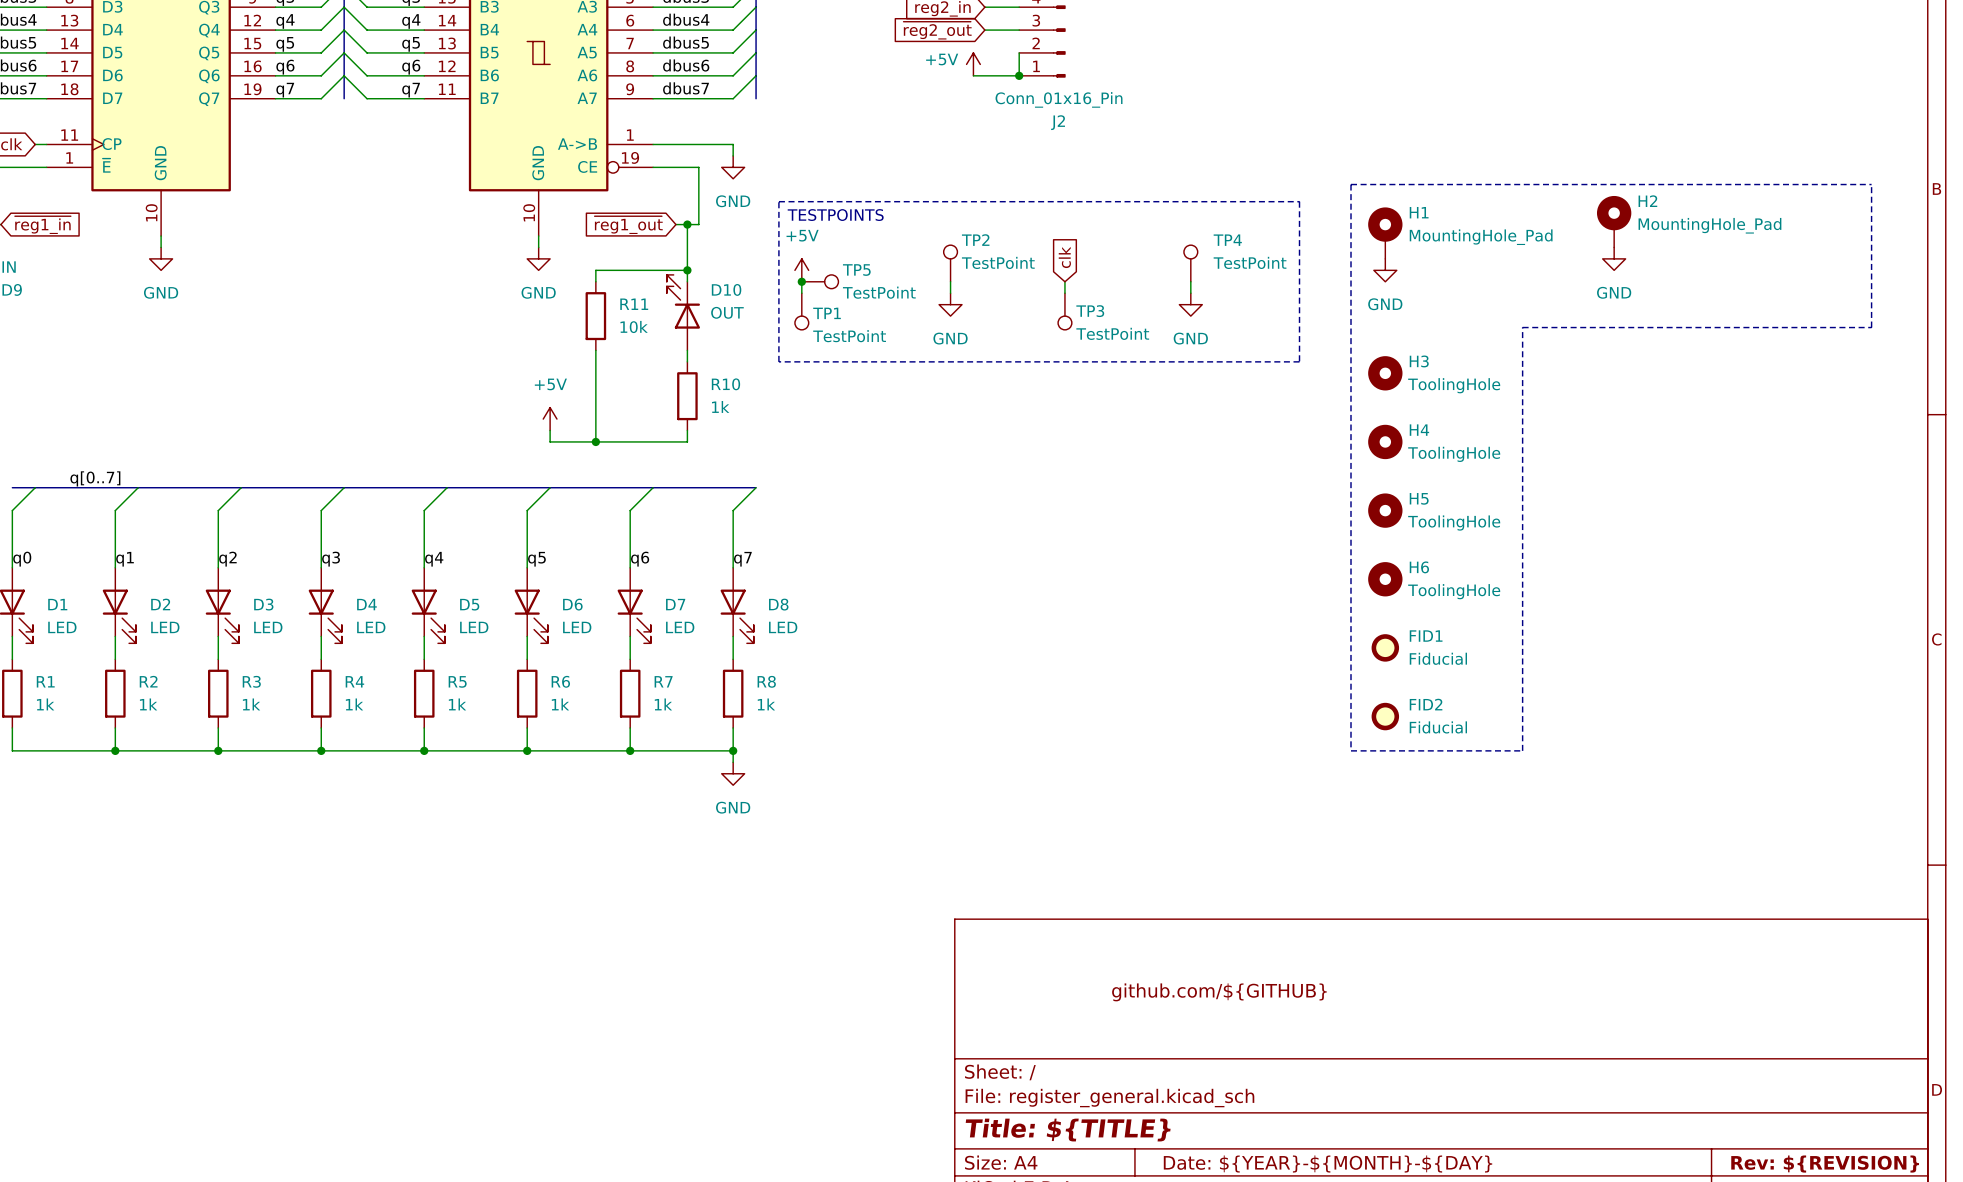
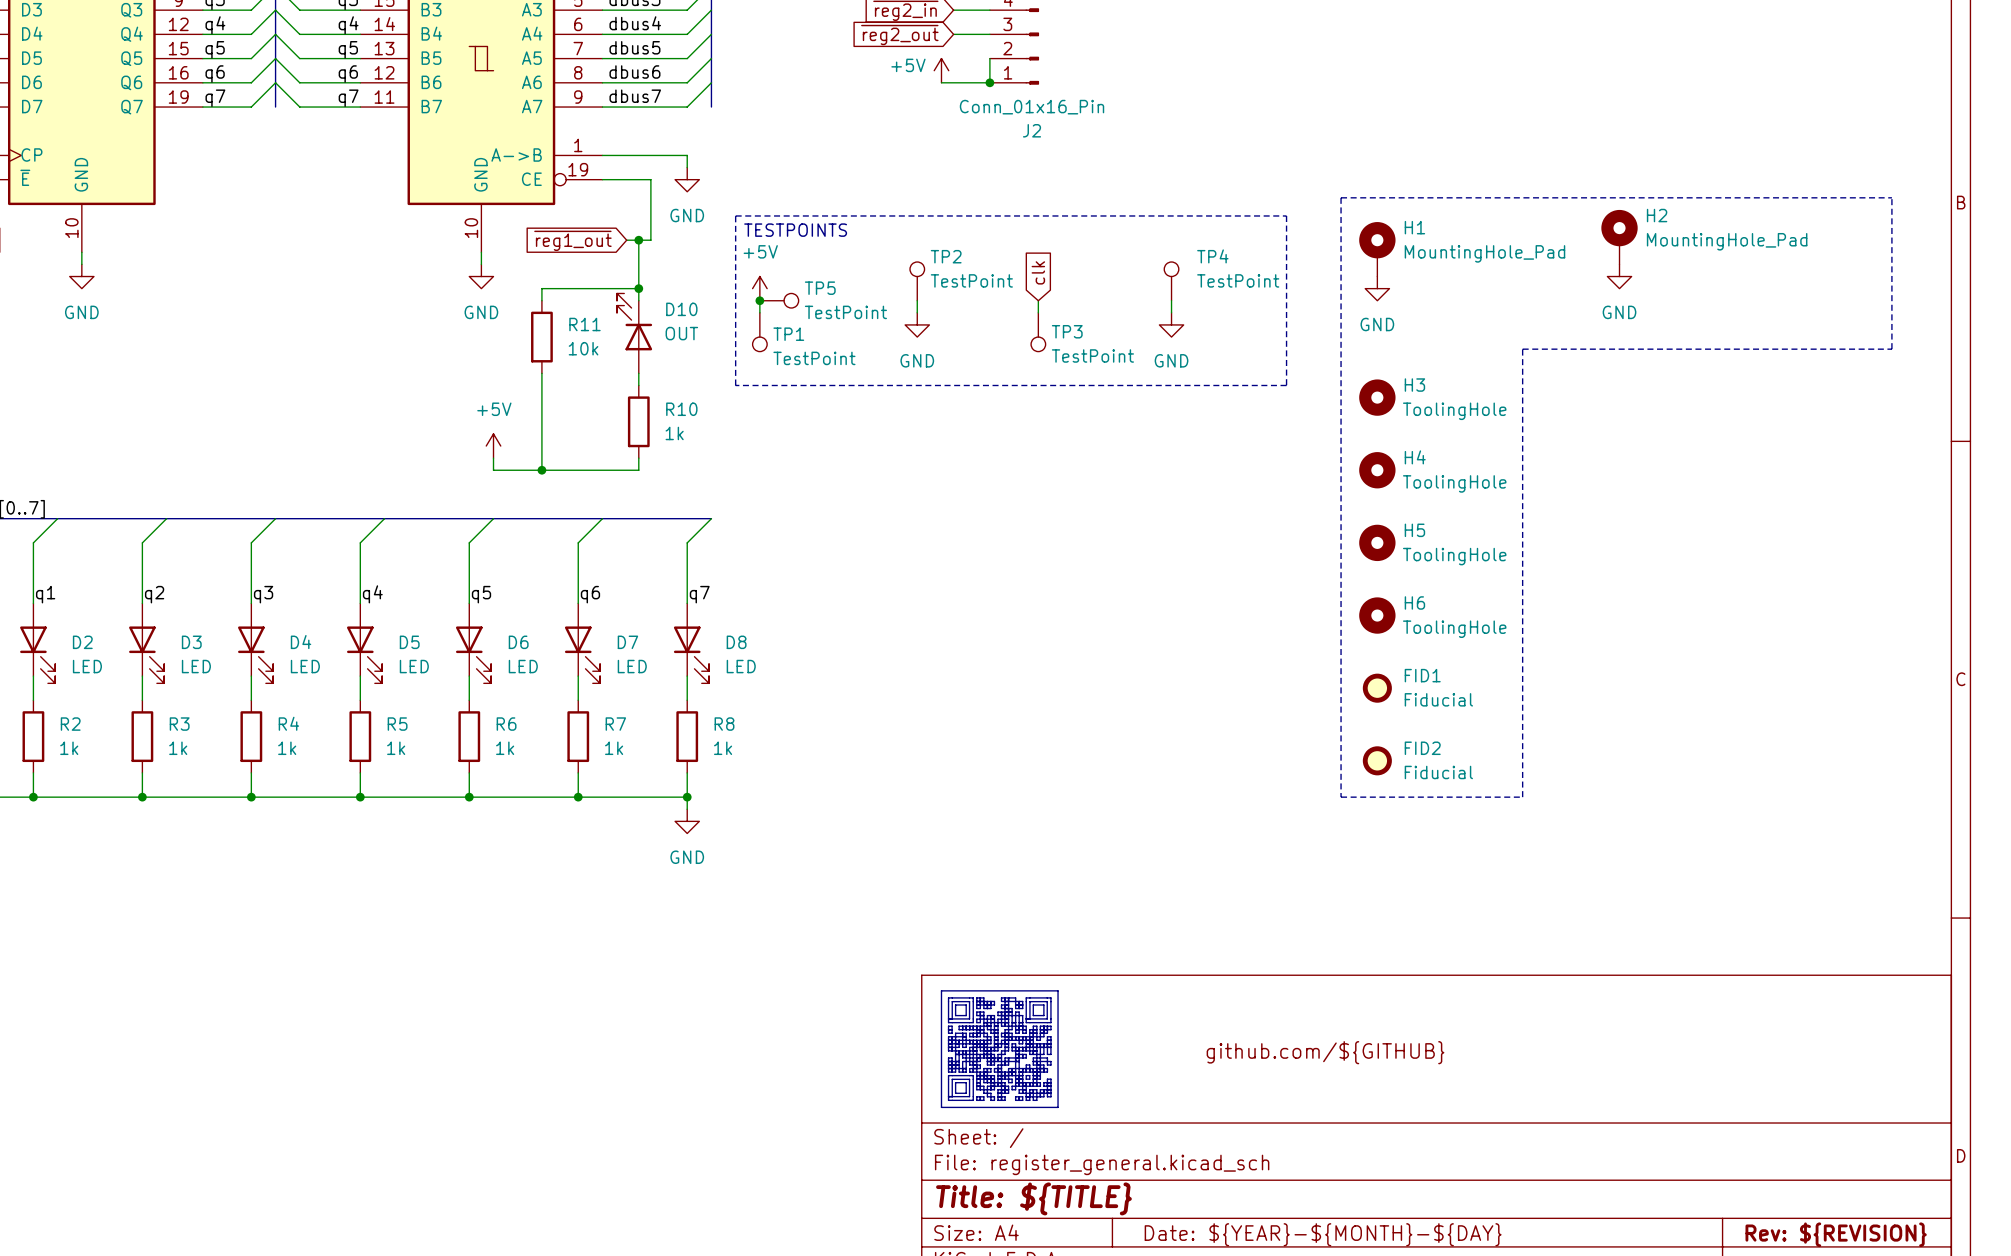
line: none -> (941, 990) (941, 1107) (1058, 1107) (1058, 990) (941, 990)
line: none -> (948, 997) (973, 997) (973, 1022) (948, 1022) (948, 997)
line: none -> (980, 997) (980, 1008) (976, 1008) (976, 997) (983, 997) (983, 1008) (990, 1008) (990, 1001)
line: none -> (1001, 997) (1001, 1001) (1022, 1001) (1022, 1008) (1015, 1008) (1015, 997) (1001, 997)
line: none -> (1005, 997) (1005, 1026)
line: none -> (1008, 997) (1008, 1050) (1001, 1050) (1001, 1100)
line: none -> (1026, 997) (1026, 1022) (1050, 1022) (1050, 997) (1026, 997)
line: none -> (976, 1001) (994, 1001) (994, 1005) (976, 1005)
line: none -> (987, 1001) (987, 1008)
line: none -> (1019, 1001) (1019, 1008)
line: none -> (955, 1005) (955, 1015) (966, 1015) (966, 1005) (955, 1005)
line: none -> (1008, 1005) (1001, 1005) (1001, 1008) (1012, 1008) (1012, 1029) (1005, 1029) (1005, 1054) (997, 1054) (997, 1061)
line: none -> (1015, 1005) (1022, 1005)
line: none -> (1033, 1005) (1033, 1015) (1043, 1015) (1043, 1005) (1033, 1005)
line: none -> (980, 1012) (980, 1022) (976, 1022) (976, 1019) (994, 1019)
line: none -> (1001, 1012) (1001, 1026) (1026, 1026) (1026, 1033) (1022, 1033) (1022, 1015) (997, 1015) (997, 1012) (1012, 1012)
line: none -> (1015, 1012) (1019, 1012) (1019, 1033) (1015, 1033) (1015, 1012)
line: none -> (983, 1015) (976, 1015) (976, 1012) (983, 1012) (983, 1036) (990, 1036) (990, 1043) (948, 1043)
line: none -> (990, 1015) (990, 1033) (997, 1033)
line: none -> (948, 1018) (969, 1018) (969, 1001) (952, 1001) (952, 1018)
line: none -> (1008, 1019) (997, 1019) (997, 1050) (980, 1050) (980, 1040)
line: none -> (1026, 1018) (1047, 1018) (1047, 1001) (1029, 1001) (1029, 1018)
line: none -> (983, 1022) (1008, 1022)
line: none -> (948, 1026) (952, 1026) (952, 1033) (948, 1033) (948, 1026)
line: none -> (976, 1026) (976, 1036)
line: none -> (980, 1026) (980, 1036) (969, 1036) (969, 1033) (987, 1033) (987, 1065) (994, 1065) (994, 1054) (955, 1054)
line: none -> (990, 1026) (959, 1026) (959, 1029) (983, 1029)
line: none -> (1043, 1026) (1043, 1036) (1001, 1036) (1001, 1033) (1012, 1033) (1012, 1040)
line: none -> (1047, 1026) (1047, 1033) (1040, 1033)
line: none -> (997, 1029) (987, 1029) (987, 1015) (994, 1015) (994, 1050)
line: none -> (1015, 1029) (1026, 1029)
line: none -> (1036, 1029) (1029, 1029) (1029, 1054) (1043, 1054) (1043, 1043)
line: none -> (1040, 1029) (1050, 1029) (1050, 1026) (1040, 1026) (1040, 1040) (1036, 1040) (1036, 1026) (1033, 1026) (1033, 1054)
line: none -> (962, 1033) (962, 1047) (966, 1047) (966, 1033) (955, 1033) (955, 1072) (948, 1072) (948, 1057) (952, 1057) (952, 1072)
line: none -> (1029, 1033) (1036, 1033)
line: none -> (952, 1036) (952, 1050)
line: none -> (966, 1036) (948, 1036) (948, 1050) (976, 1050)
line: none -> (1019, 1036) (1019, 1043) (1022, 1043) (1022, 1036)
line: none -> (1026, 1036) (1026, 1050)
line: none -> (1047, 1036) (1047, 1054) (1050, 1054) (1050, 1036) (1047, 1036)
line: none -> (948, 1040) (990, 1040)
line: none -> (959, 1040) (959, 1047) (948, 1047)
line: none -> (973, 1040) (973, 1072)
line: none -> (976, 1040) (976, 1089) (994, 1089) (994, 1075) (976, 1075)
line: none -> (983, 1040) (983, 1057)
line: none -> (1033, 1040) (1001, 1040) (1001, 1047) (969, 1047) (969, 1065) (980, 1065) (980, 1068) (969, 1068) (969, 1072) (990, 1072) (990, 1068) (983, 1068) (983, 1082) (1005, 1082) (1005, 1093)
line: none -> (994, 1043) (1008, 1043)
line: none -> (1026, 1043) (1050, 1043)
line: none -> (1036, 1043) (1036, 1086)
line: none -> (1040, 1043) (1040, 1079) (1033, 1079)
line: none -> (990, 1047) (990, 1065)
line: none -> (1012, 1047) (1050, 1047)
line: none -> (1019, 1047) (1019, 1086)
line: none -> (959, 1050) (959, 1072) (966, 1072) (966, 1050)
line: none -> (962, 1050) (962, 1057) (1001, 1057)
line: none -> (1036, 1050) (1012, 1050) (1012, 1043) (1015, 1043) (1015, 1089) (1012, 1089) (1012, 1086) (1040, 1086) (1040, 1082) (1015, 1082)
line: none -> (980, 1054) (980, 1061) (962, 1061) (962, 1072)
line: none -> (1015, 1054) (1026, 1054) (1026, 1057) (1005, 1057) (1005, 1065)
line: none -> (1008, 1057) (1008, 1065) (997, 1065) (997, 1086)
line: none -> (948, 1061) (959, 1061)
line: none -> (987, 1061) (1019, 1061)
line: none -> (1033, 1061) (1050, 1061) (1050, 1065) (1047, 1065) (1047, 1057) (1033, 1057) (1033, 1065) (1043, 1065) (1043, 1072)
line: none -> (948, 1065) (959, 1065)
line: none -> (948, 1068) (966, 1068)
line: none -> (987, 1068) (987, 1082)
line: none -> (1001, 1068) (994, 1068) (994, 1072) (1015, 1072)
line: none -> (1012, 1068) (1012, 1075)
line: none -> (1022, 1068) (1022, 1093)
line: none -> (1033, 1068) (1033, 1086)
line: none -> (980, 1072) (980, 1089)
line: none -> (1005, 1072) (1005, 1079)
line: none -> (1019, 1072) (1047, 1072) (1047, 1068) (1008, 1068) (1008, 1082) (1012, 1082) (1012, 1079) (997, 1079)
line: none -> (1026, 1072) (1026, 1065) (1029, 1065) (1029, 1072)
line: none -> (948, 1075) (973, 1075) (973, 1100) (948, 1100) (948, 1075)
line: none -> (990, 1075) (990, 1089)
line: none -> (997, 1075) (1022, 1075)
line: none -> (1026, 1075) (1026, 1079) (1029, 1079) (1029, 1075) (1026, 1075)
line: none -> (1033, 1075) (1040, 1075)
line: none -> (976, 1079) (994, 1079)
line: none -> (1015, 1079) (1022, 1079)
line: none -> (1047, 1079) (1047, 1096) (1050, 1096) (1050, 1079) (1047, 1079)
line: none -> (955, 1082) (955, 1093) (966, 1093) (966, 1082) (955, 1082)
line: none -> (1026, 1082) (1026, 1100) (1029, 1100) (1029, 1089) (1036, 1089) (1036, 1100) (1033, 1100) (1033, 1089)
line: none -> (1050, 1082) (1043, 1082) (1043, 1086) (1050, 1086)
line: none -> (976, 1086) (983, 1086) (983, 1093) (990, 1093) (990, 1100) (994, 1100) (994, 1096) (987, 1096) (987, 1086) (1008, 1086) (1008, 1093) (997, 1093)
line: none -> (1008, 1089) (997, 1089) (997, 1100) (1005, 1100) (1005, 1096) (997, 1096)
line: none -> (1026, 1089) (1019, 1089) (1019, 1093) (1050, 1093)
line: none -> (1043, 1089) (1043, 1096) (1026, 1096)
line: none -> (1050, 1089) (1040, 1089) (1040, 1096)
line: none -> (948, 1096) (969, 1096) (969, 1079) (952, 1079) (952, 1096)
line: none -> (976, 1096) (983, 1096) (983, 1100) (976, 1100) (976, 1096)
line: none -> (1015, 1096) (1022, 1096) (1022, 1100) (1015, 1100) (1015, 1096)

